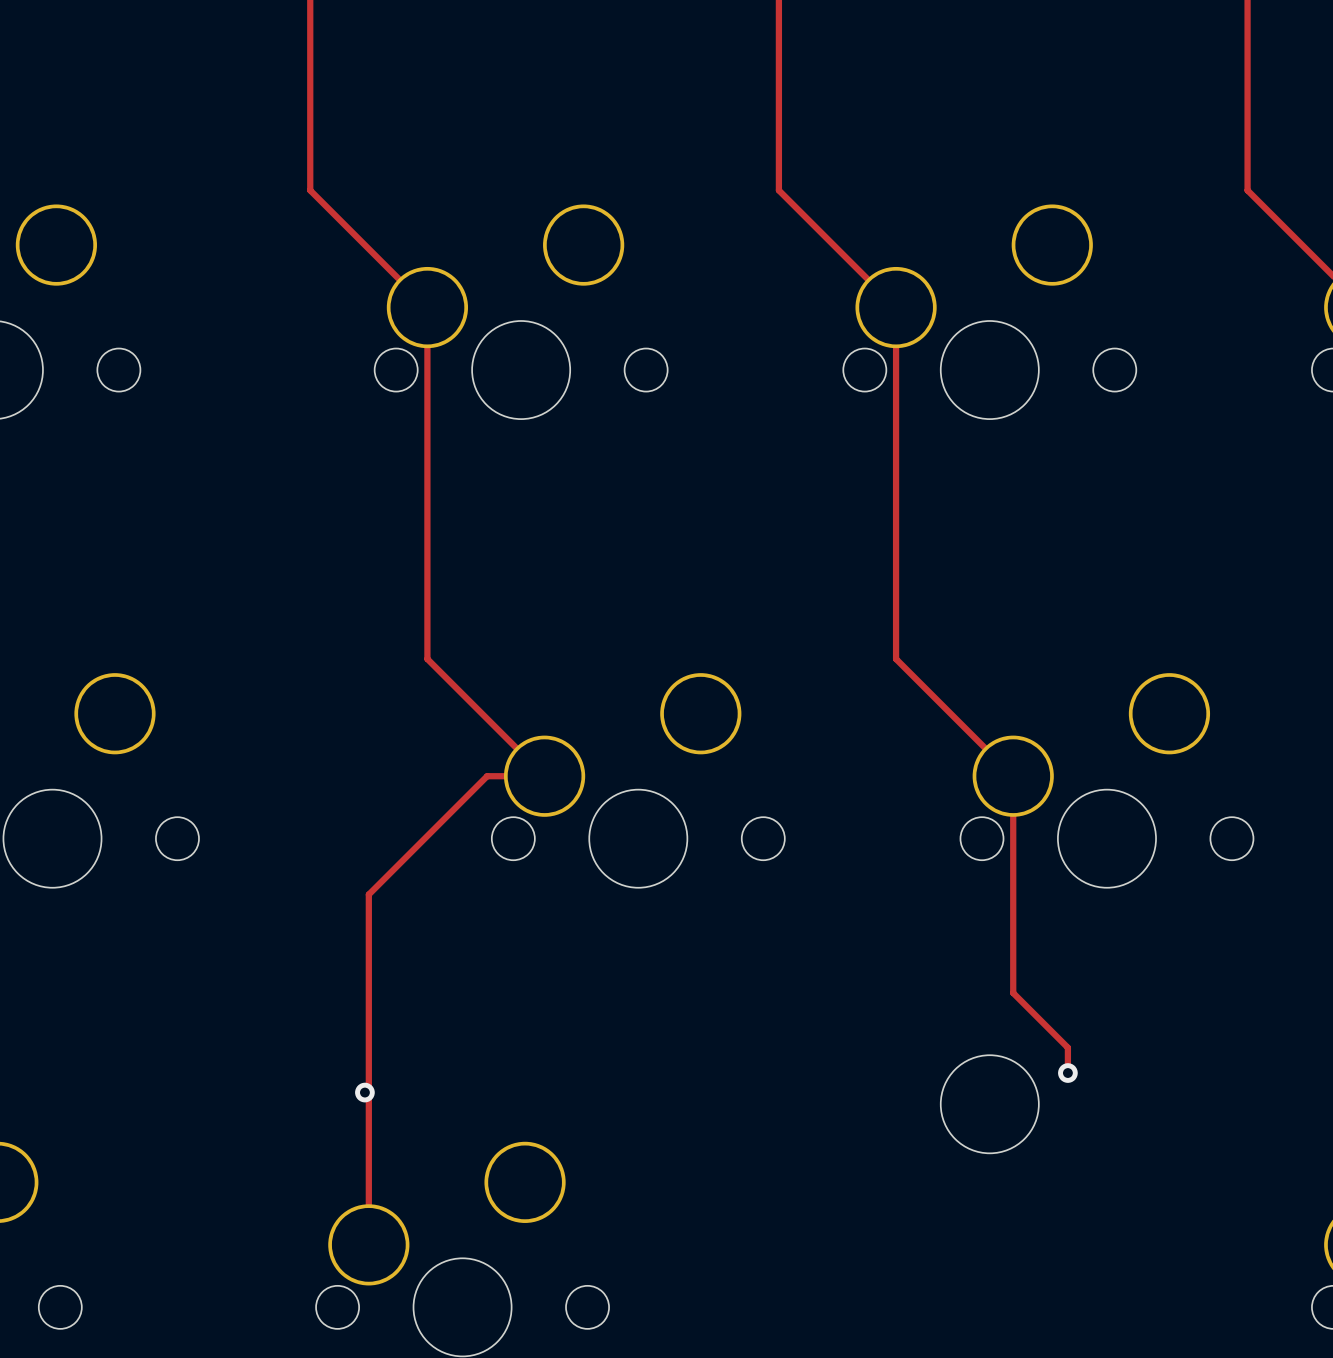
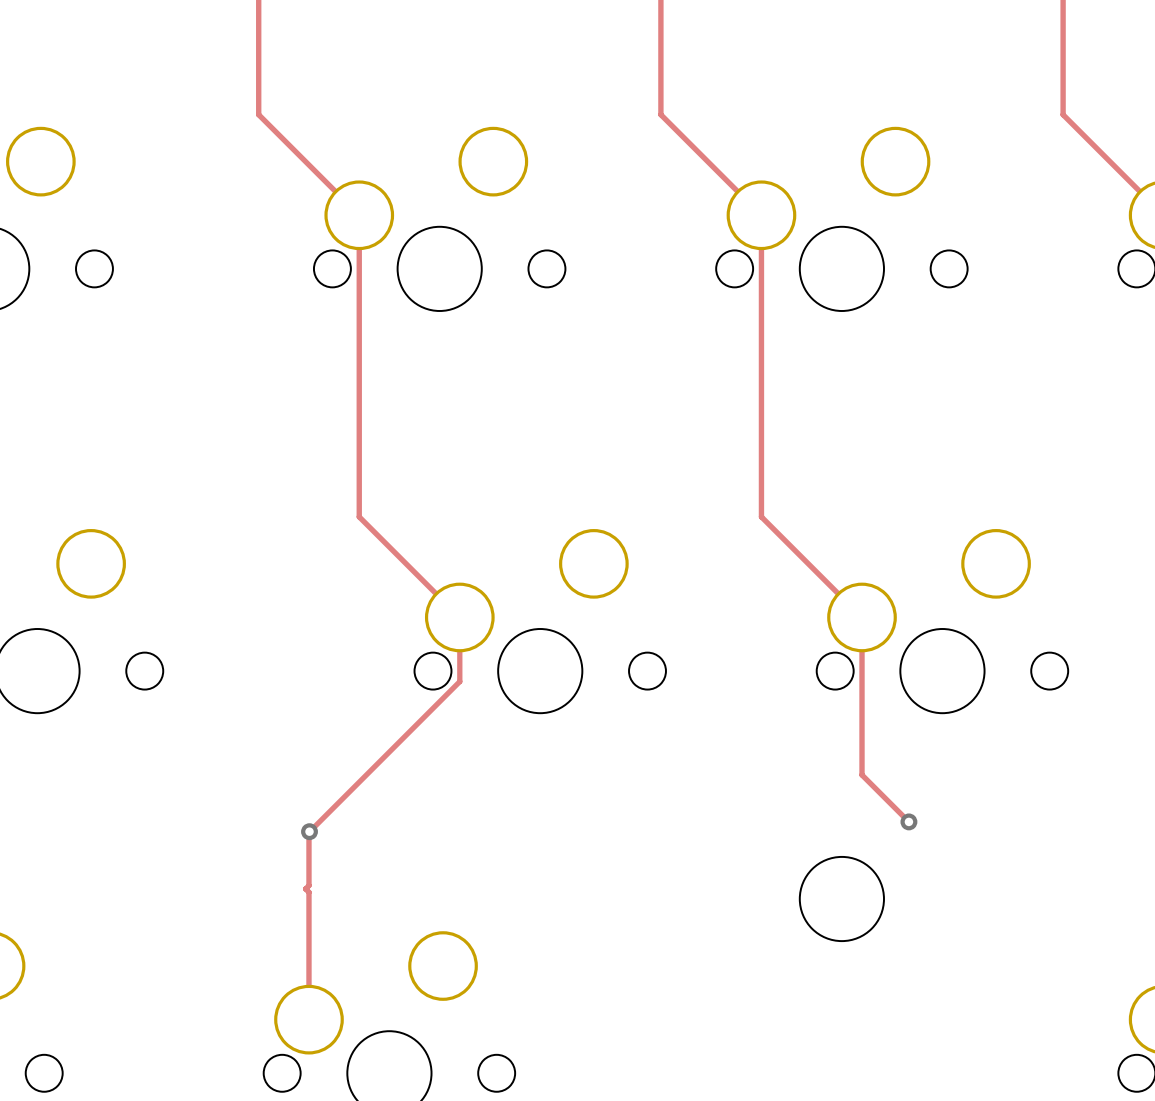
track: (544, 776) (487, 776) (368, 894) (368, 1026) -> (459, 617) (459, 681) (309, 831)
track: (1013, 959) (1013, 993) (1067, 1047) (1067, 1073) -> (862, 774) (908, 821)
via position: (1067, 1073) -> (908, 821)
via position: (364, 1092) -> (309, 831)

